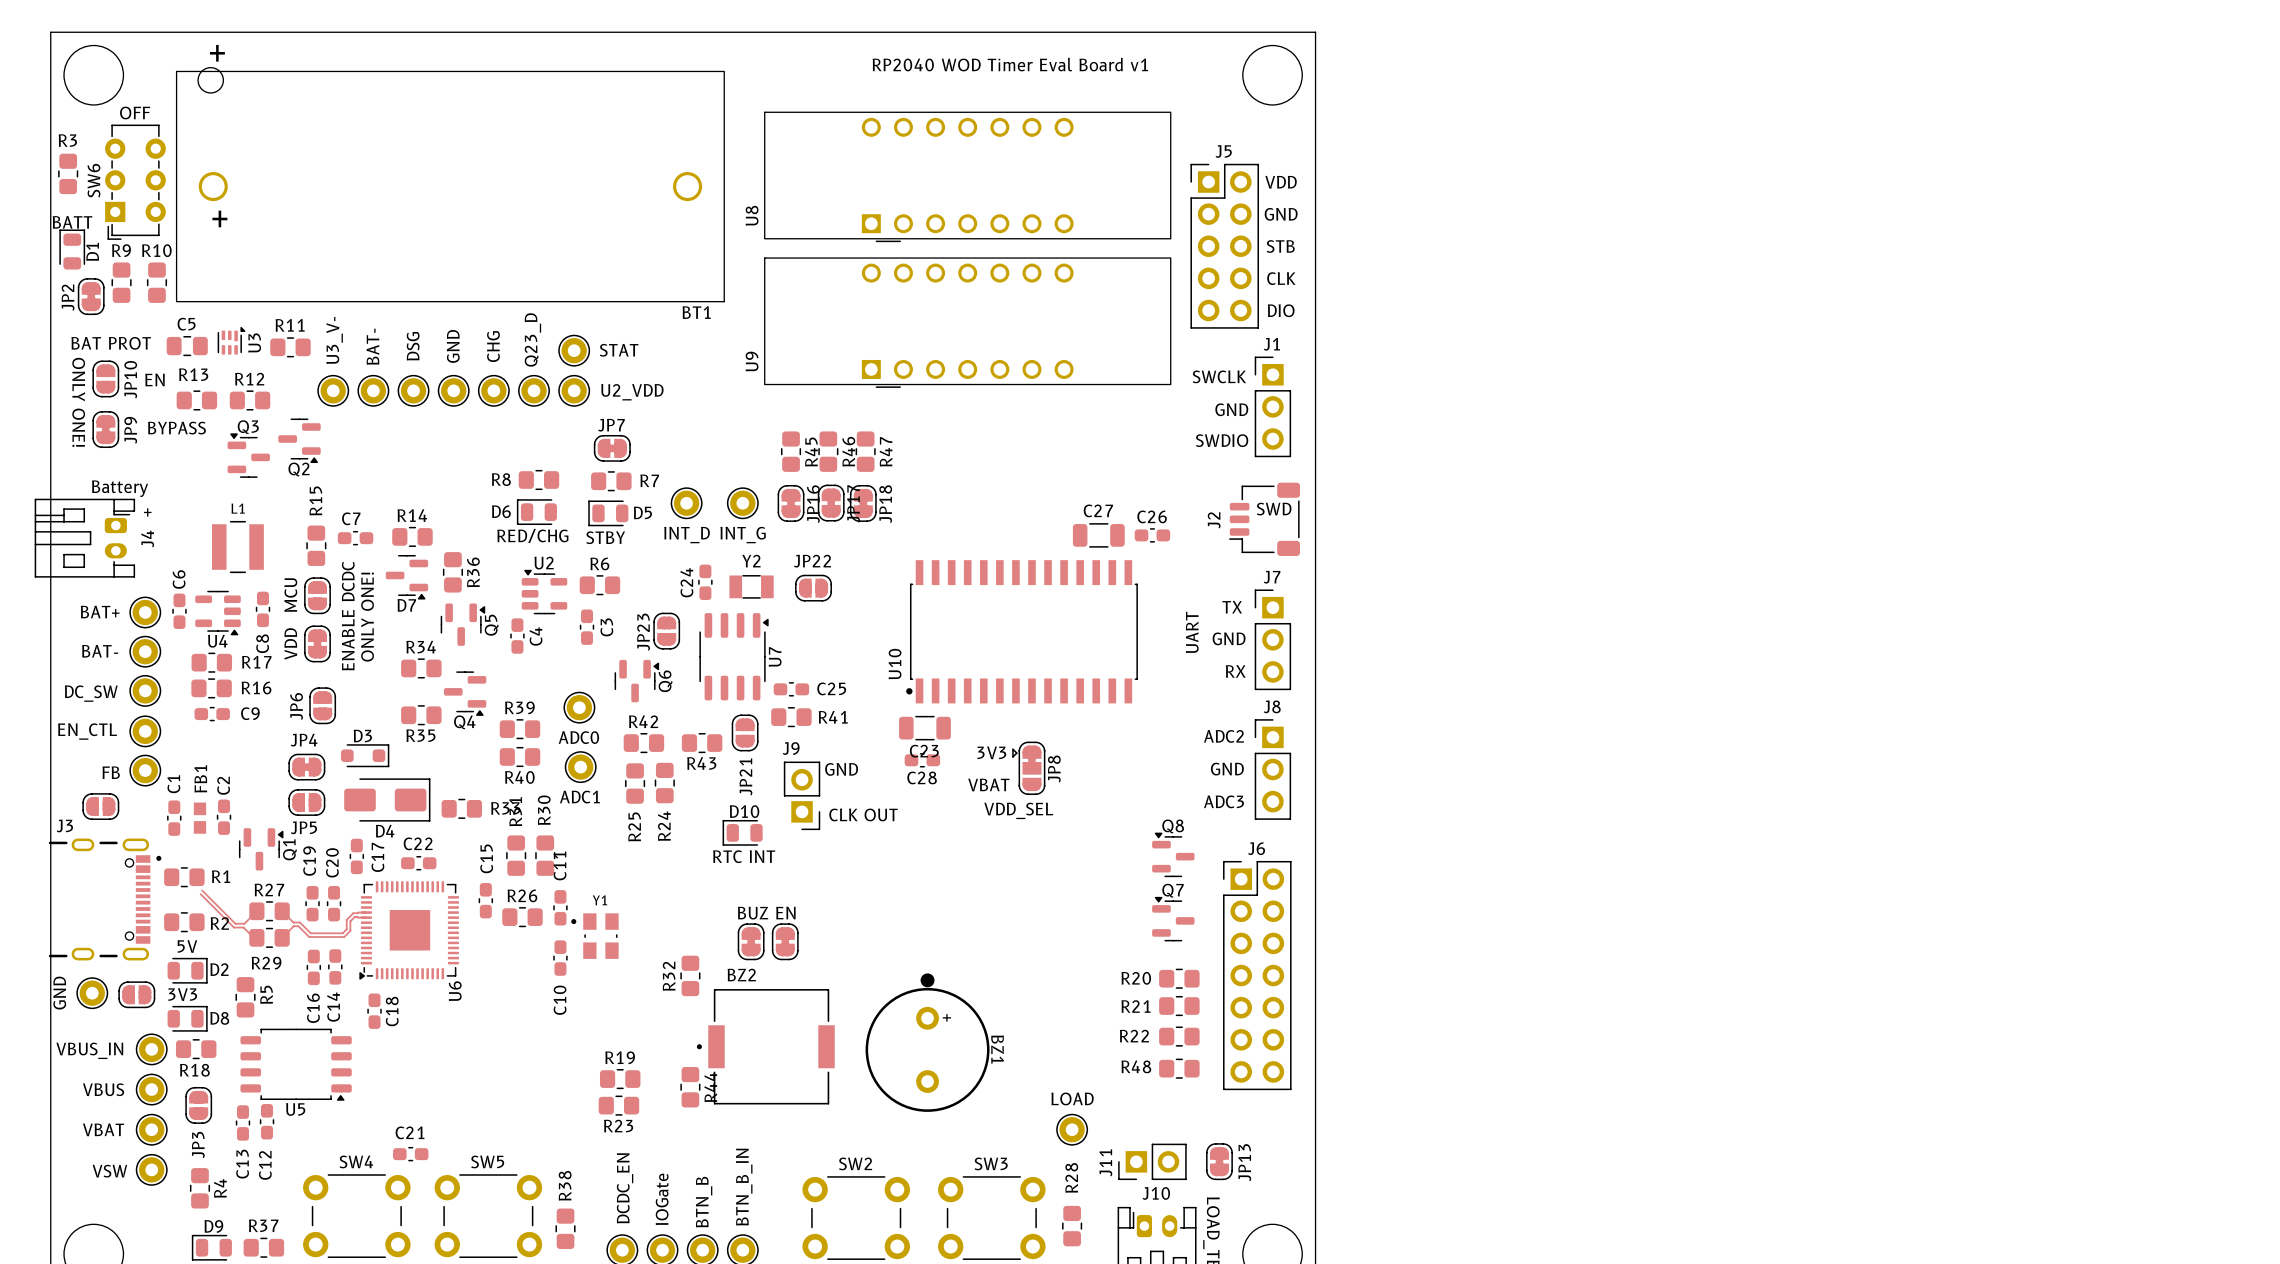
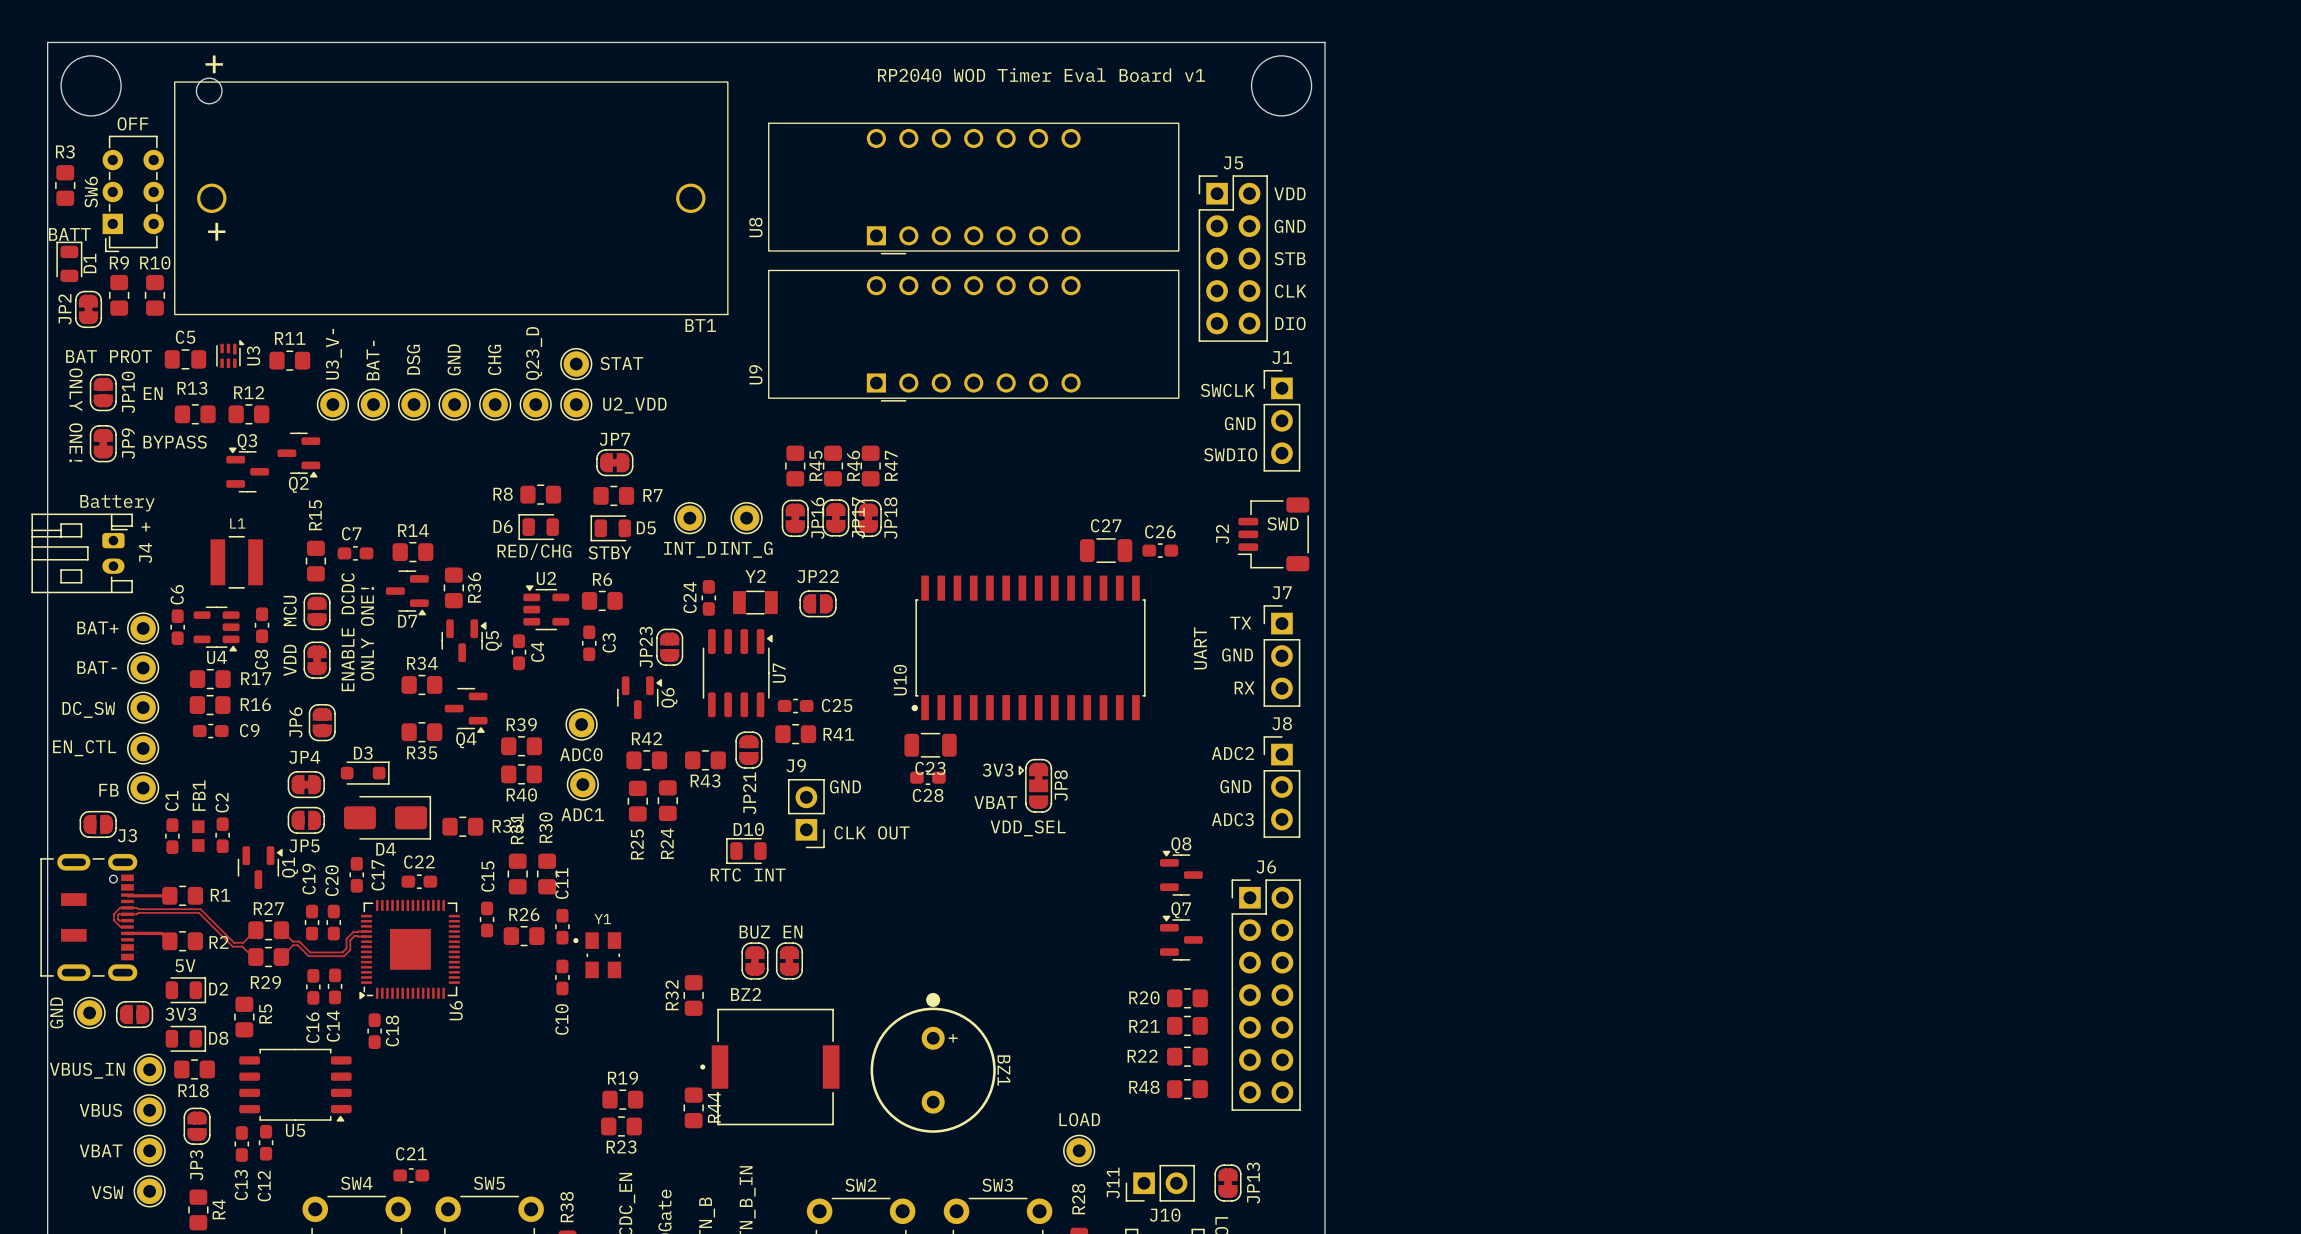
J3 name position: J3 (64, 825) -> J3 (127, 835)
J3 footprint: [48, 838, 162, 961] -> [40, 853, 138, 981]
top track: none -> (127, 895) (169, 895)
top track: none -> (200, 909) (120, 907) (114, 914) (114, 920) (120, 927) (127, 927)
top track: none -> (199, 912) (138, 912) (117, 915) (119, 920) (127, 920)
top track: none -> (127, 933) (161, 933) (169, 941)

